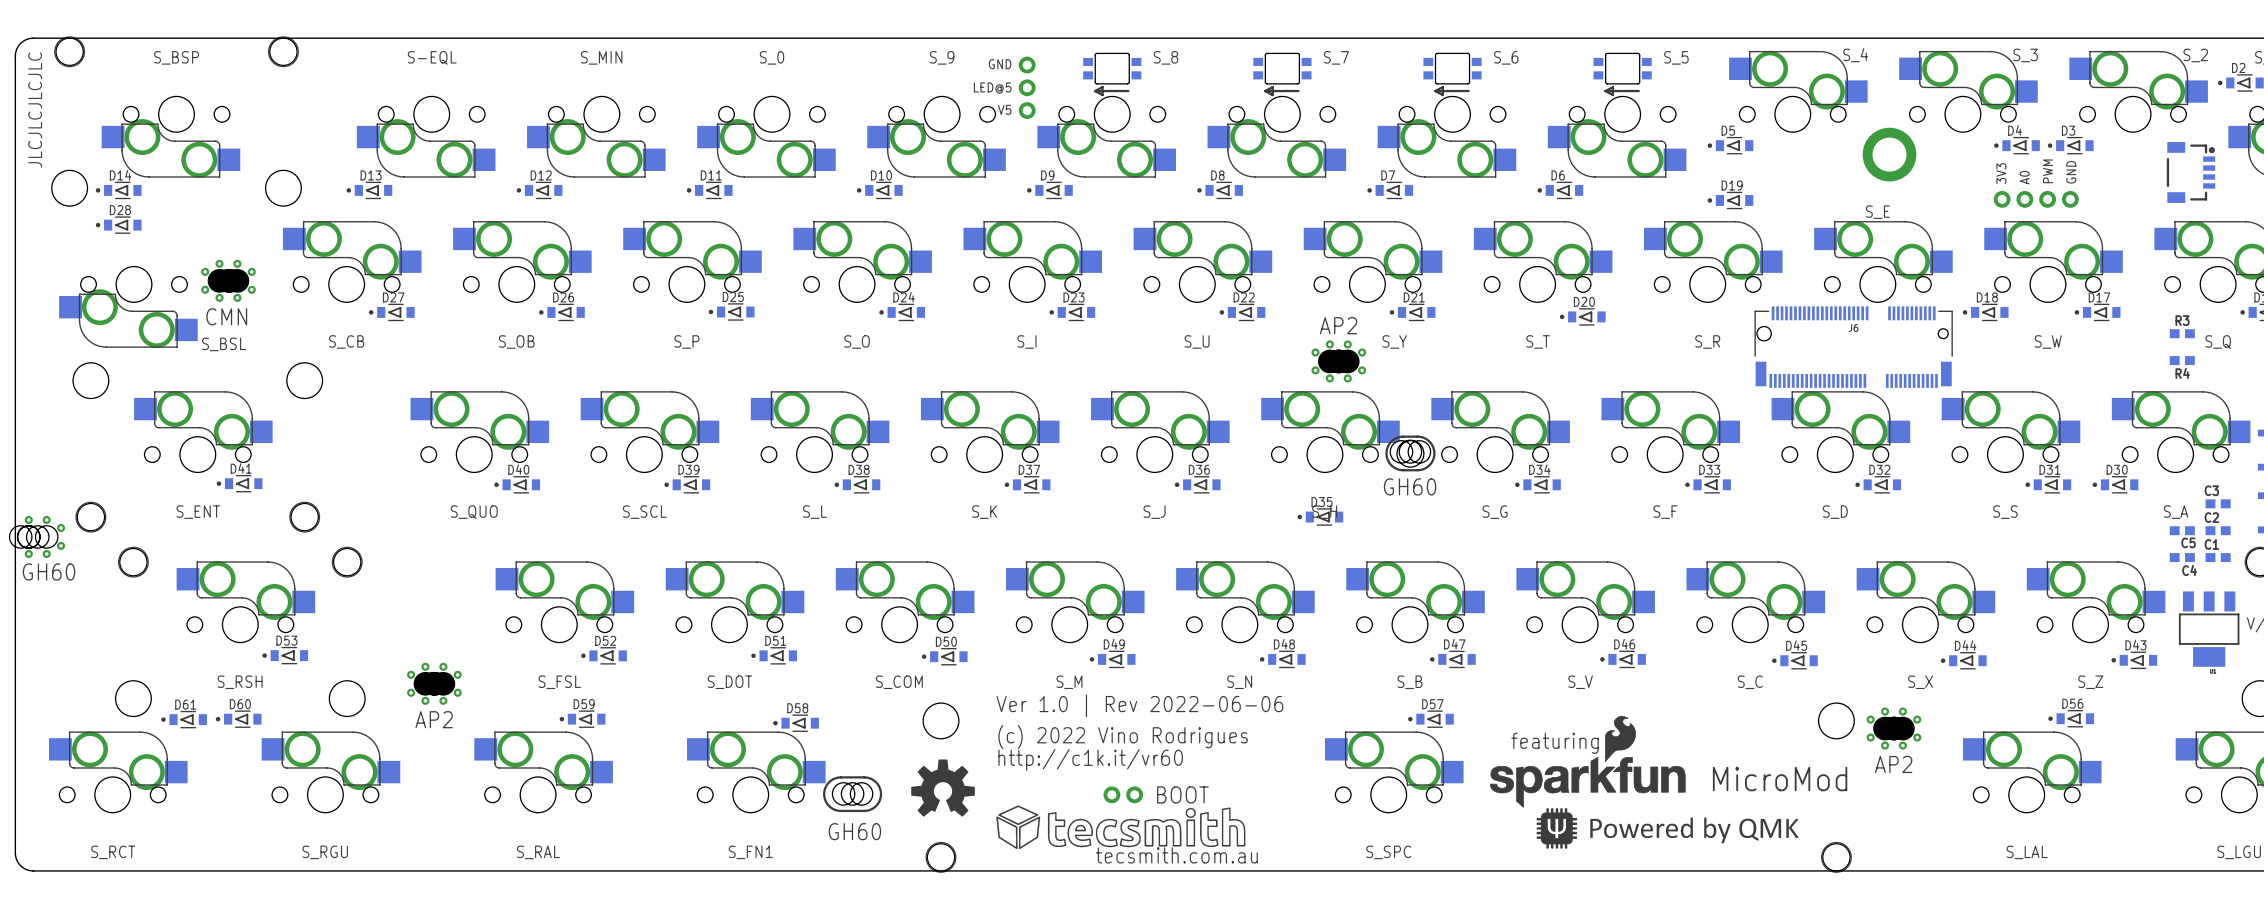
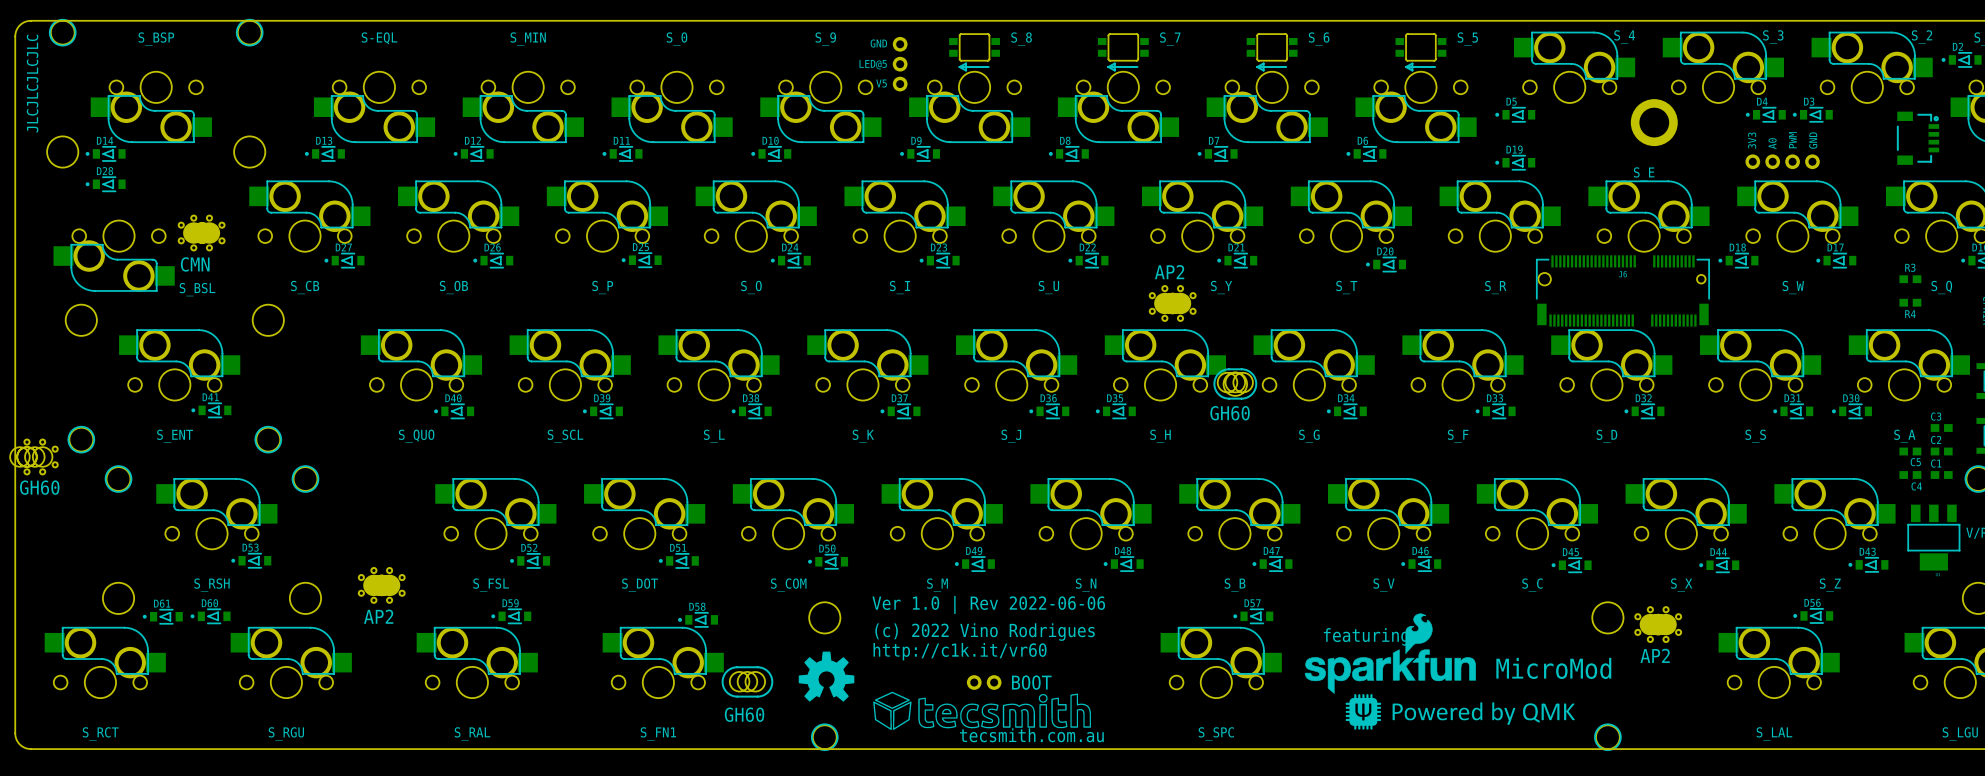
D35 position: (1320, 517) -> (1115, 411)

